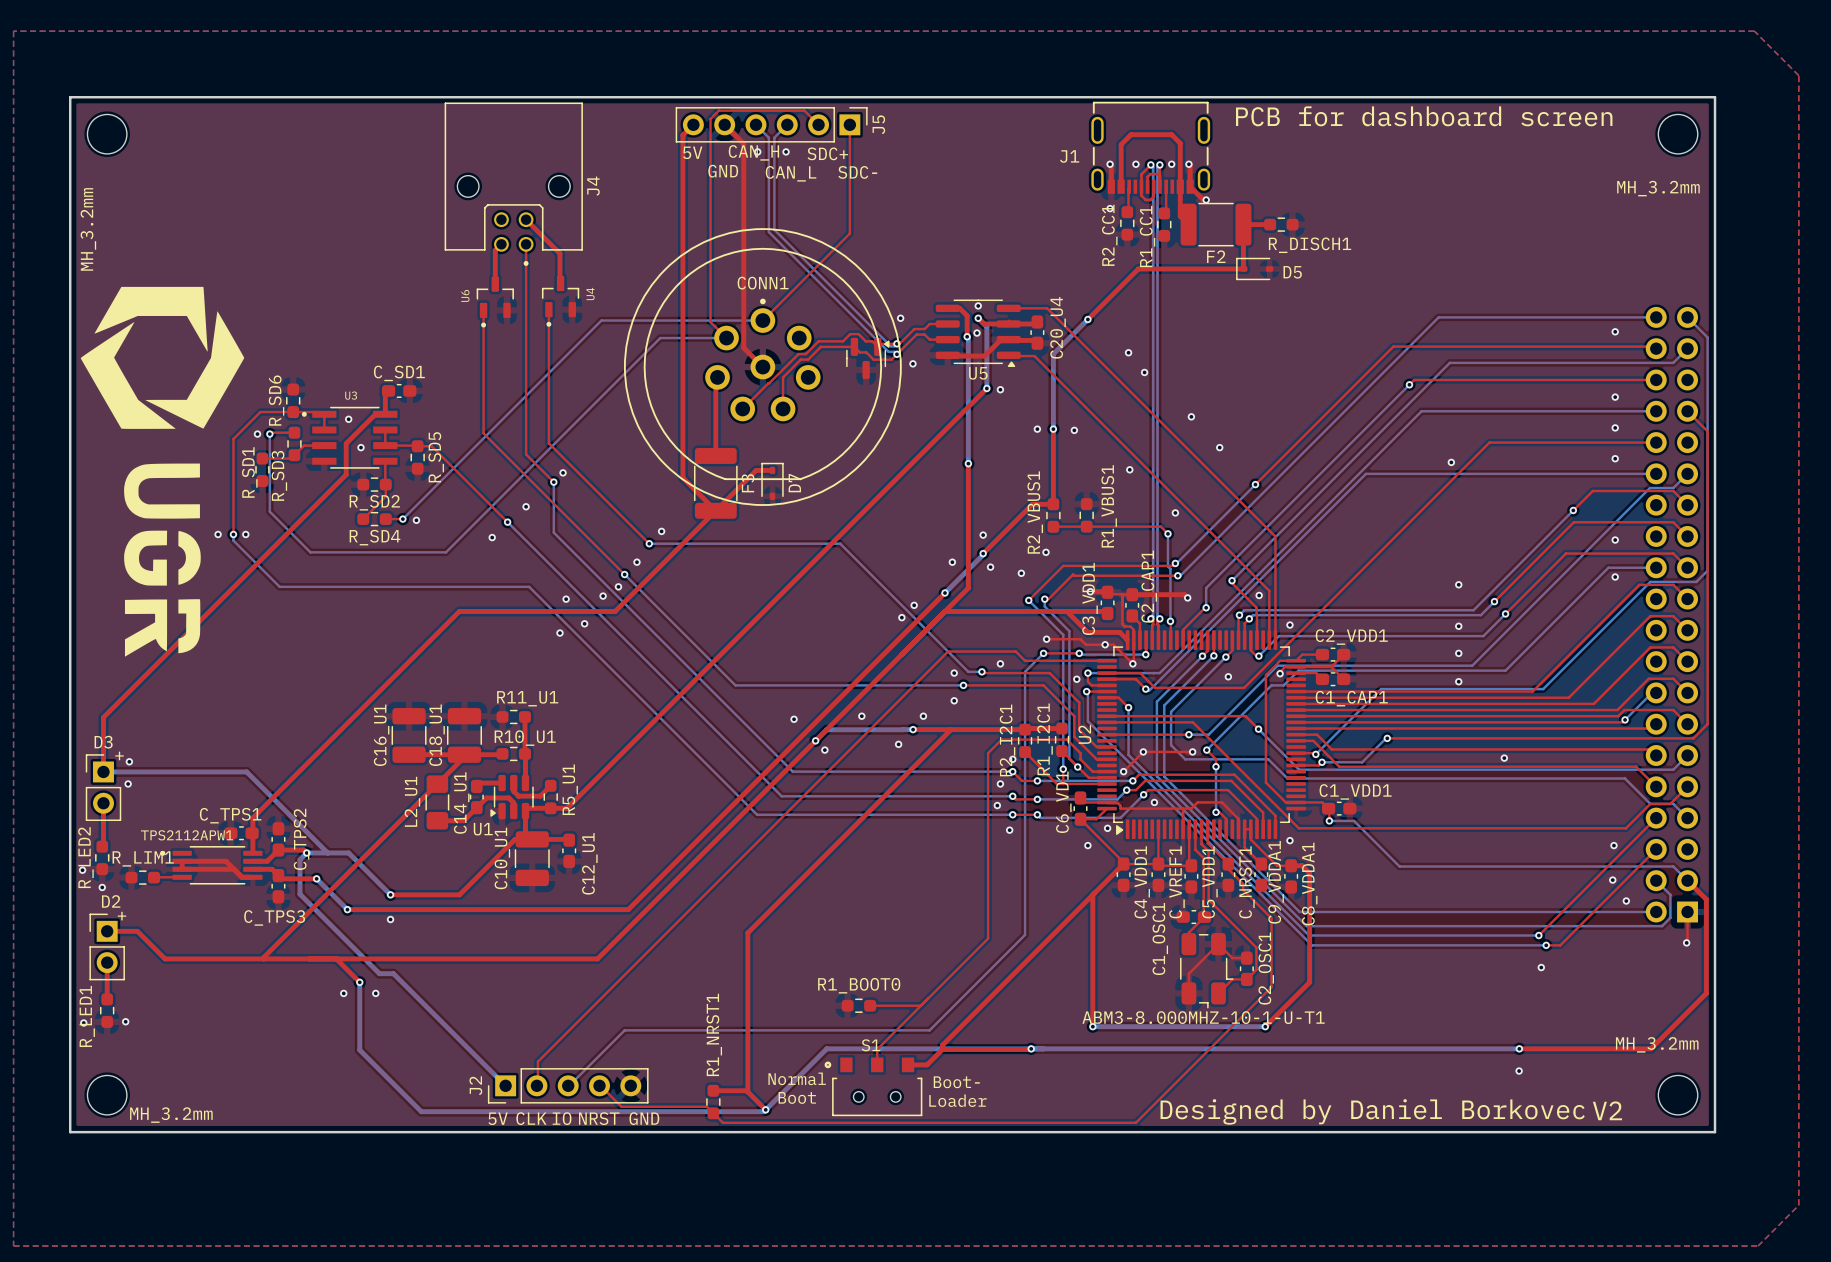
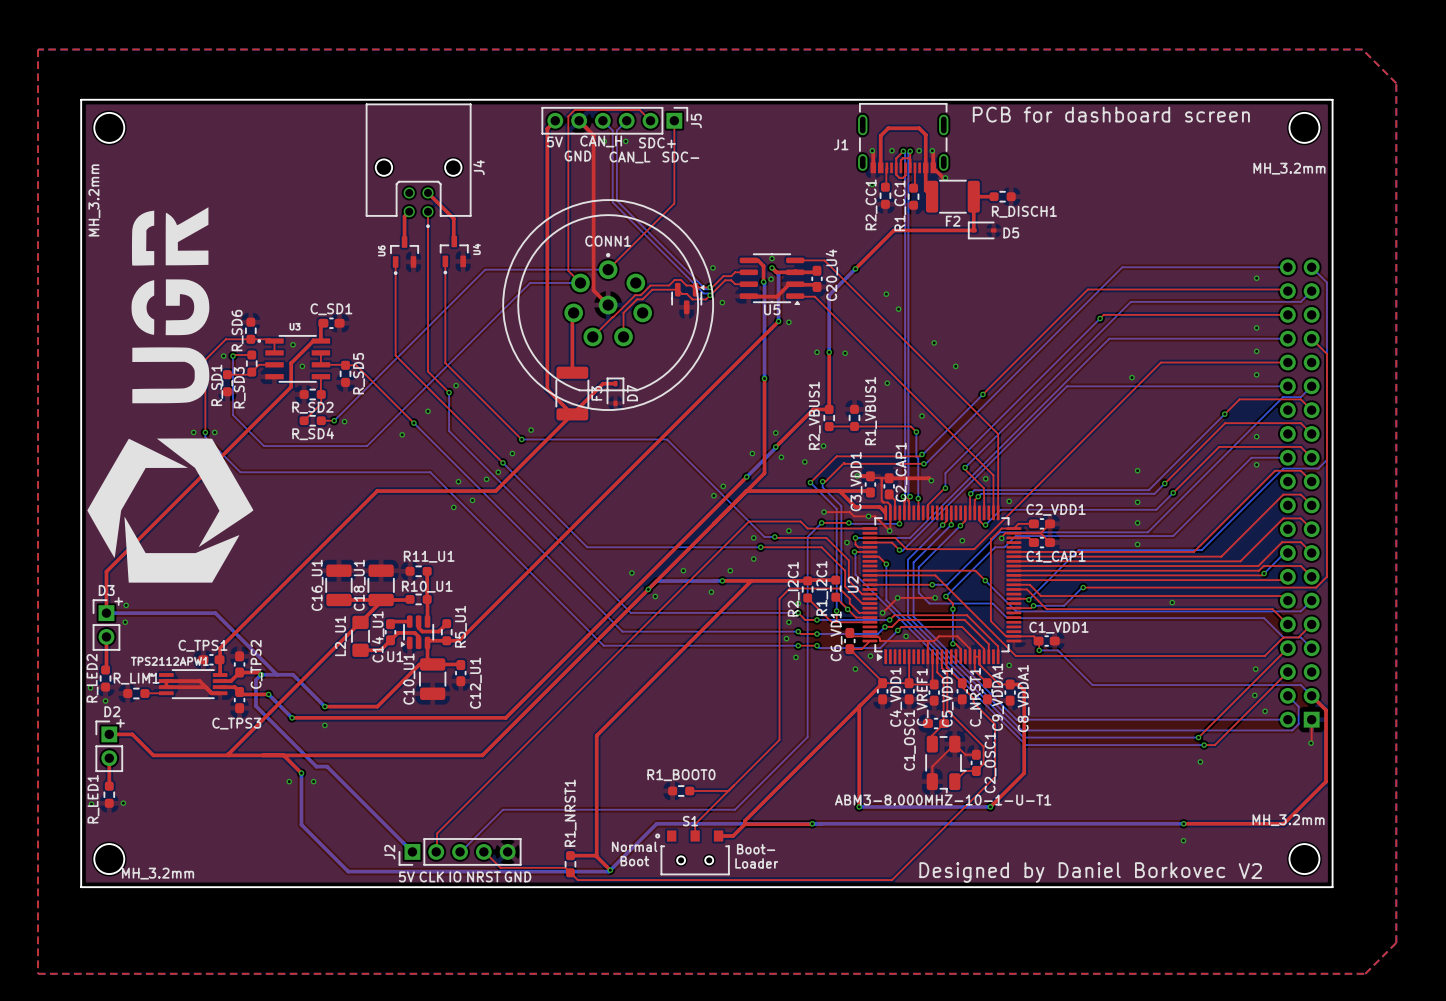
drawing: none -> [87, 207, 254, 583]
drawing: [80, 286, 245, 657] -> none

